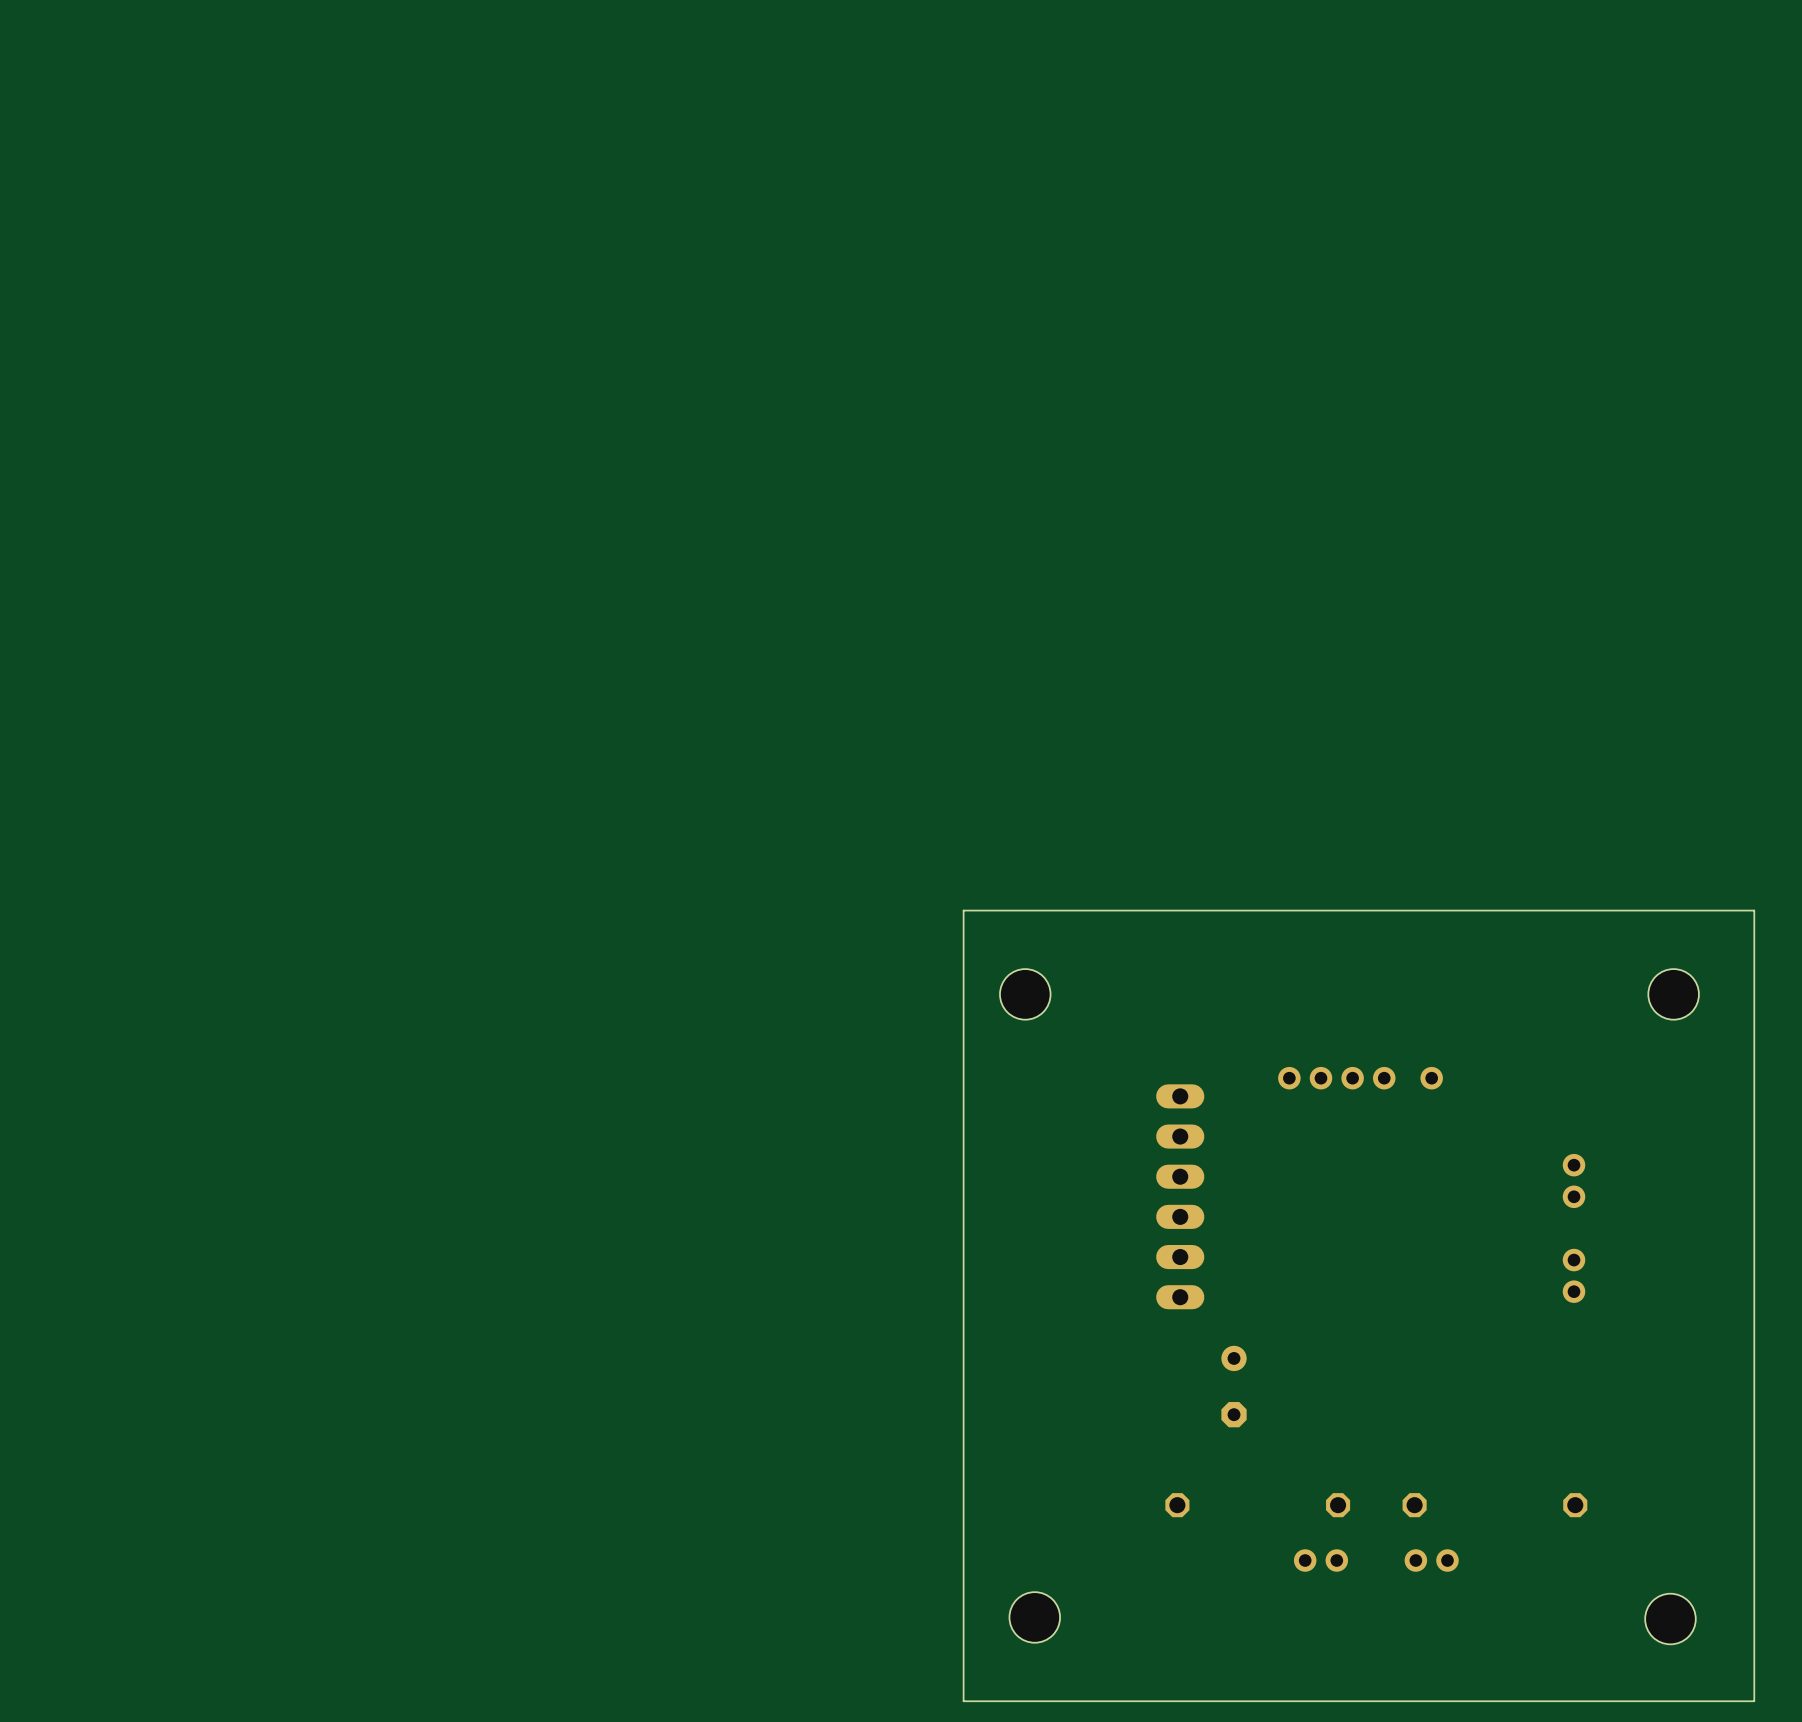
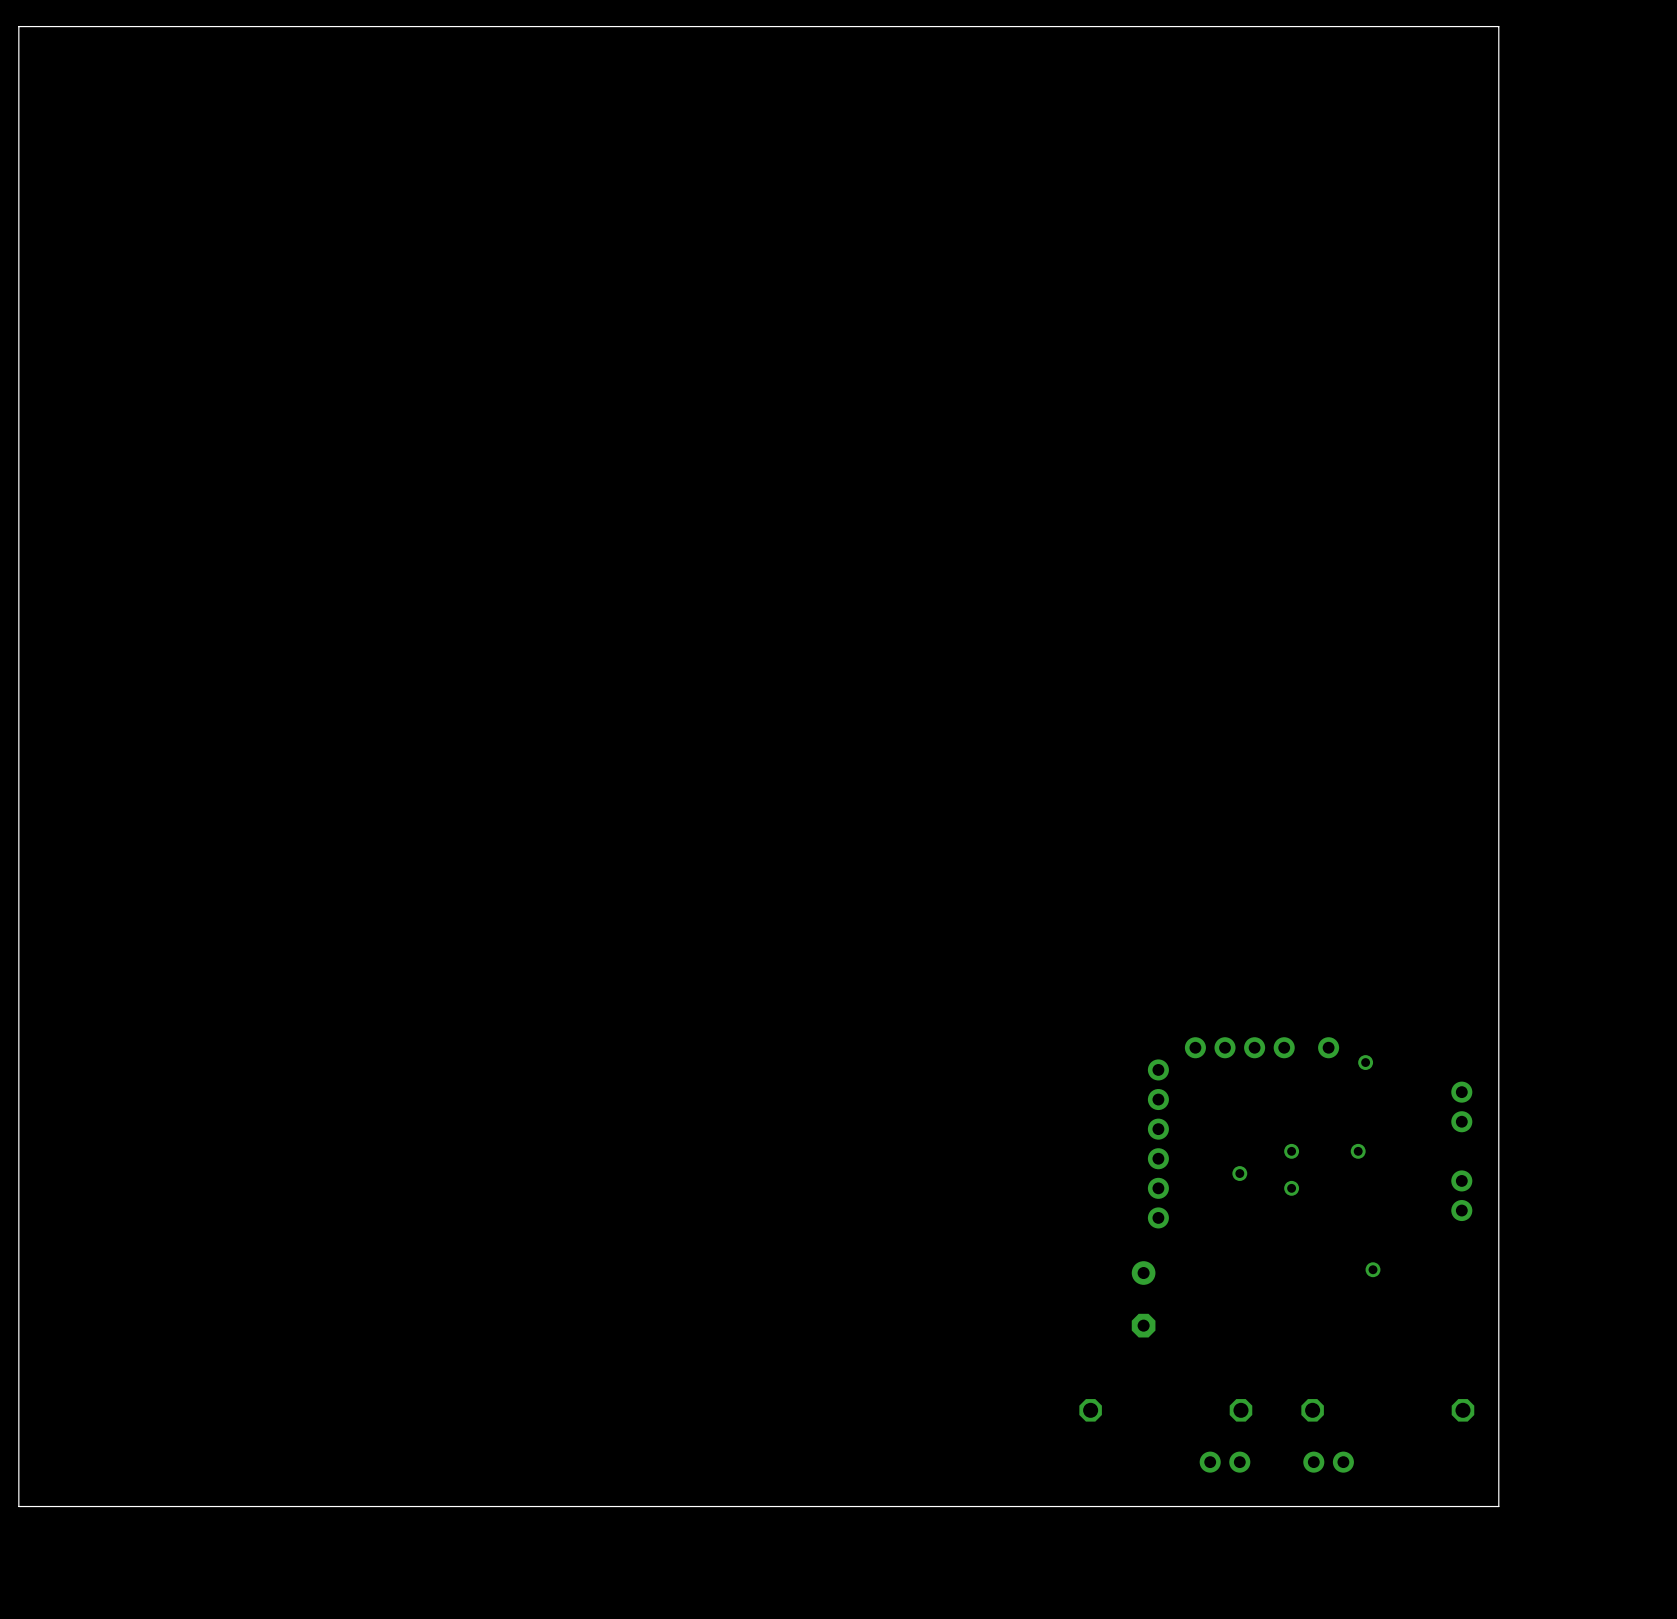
board edge: none -> (1498, 26) (18, 26) (18, 1506) (1498, 1506) (1498, 26)
board edge: (1754, 910) (963, 910) (963, 1701) (1754, 1701) (1754, 910) -> none
part: (1025, 994) -> none
part: (1673, 994) -> none
part position: (1336, 1078) -> (1239, 1047)
part position: (1431, 1078) -> (1328, 1047)
via: none -> (1365, 1062)
part: none -> (1158, 1114)
part: (1180, 1196) -> none
via: none -> (1291, 1151)
via: none -> (1358, 1151)
via: none -> (1239, 1173)
via: none -> (1291, 1188)
part: none -> (1158, 1203)
via: none -> (1373, 1269)
part: (1034, 1617) -> none
part: (1670, 1619) -> none

